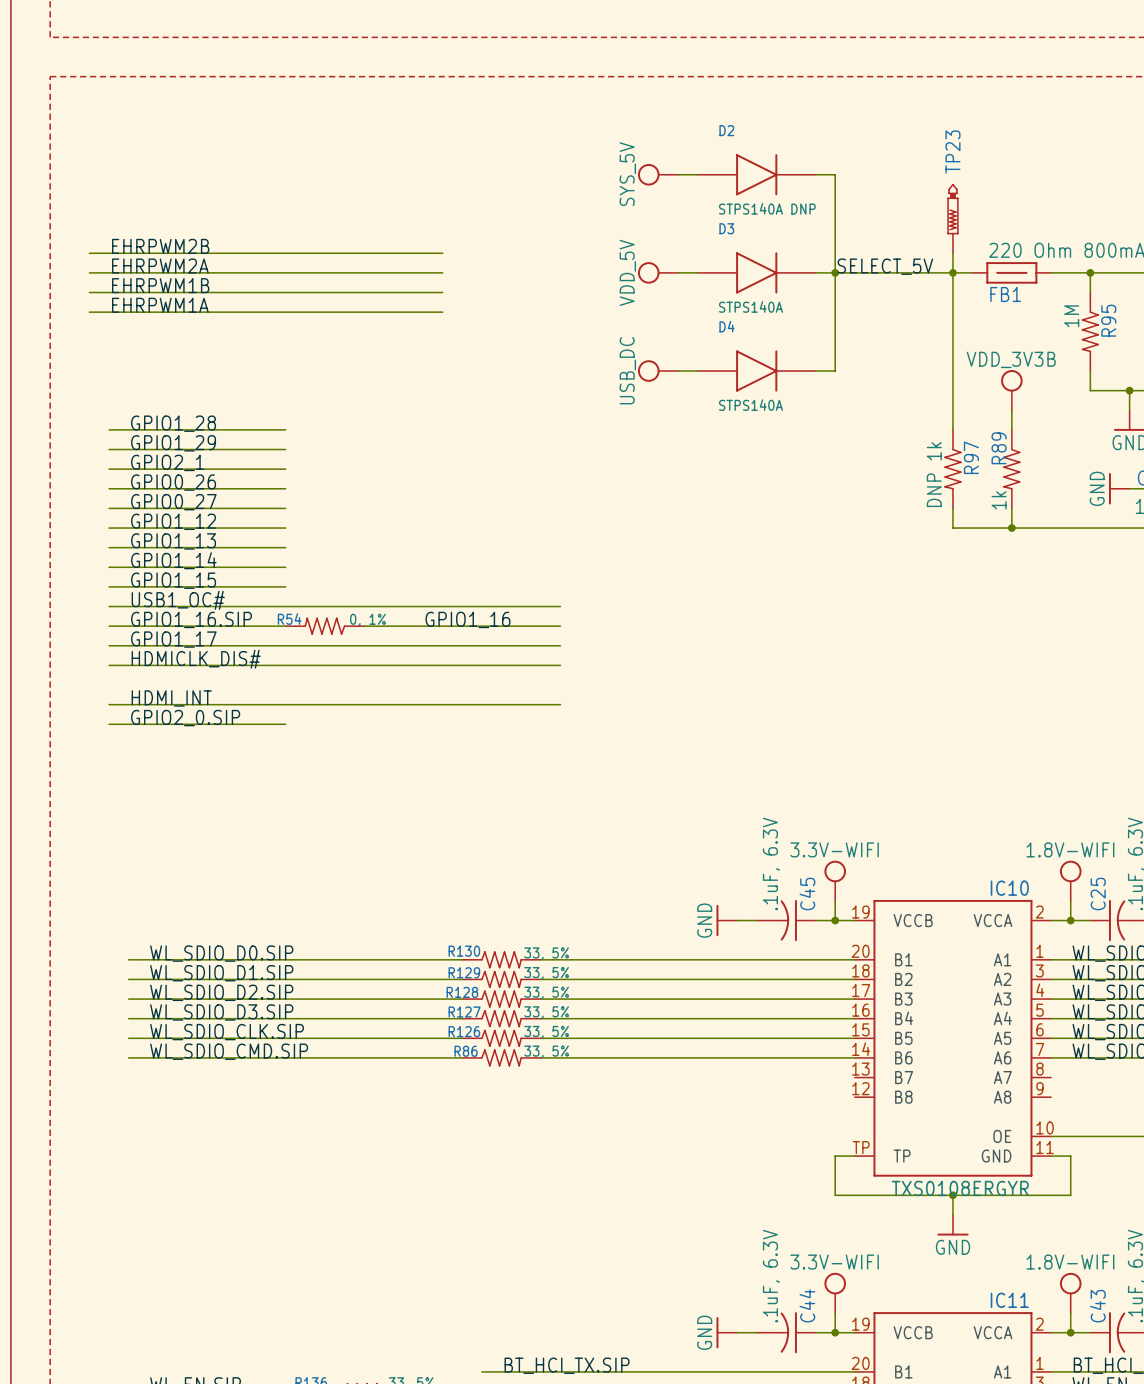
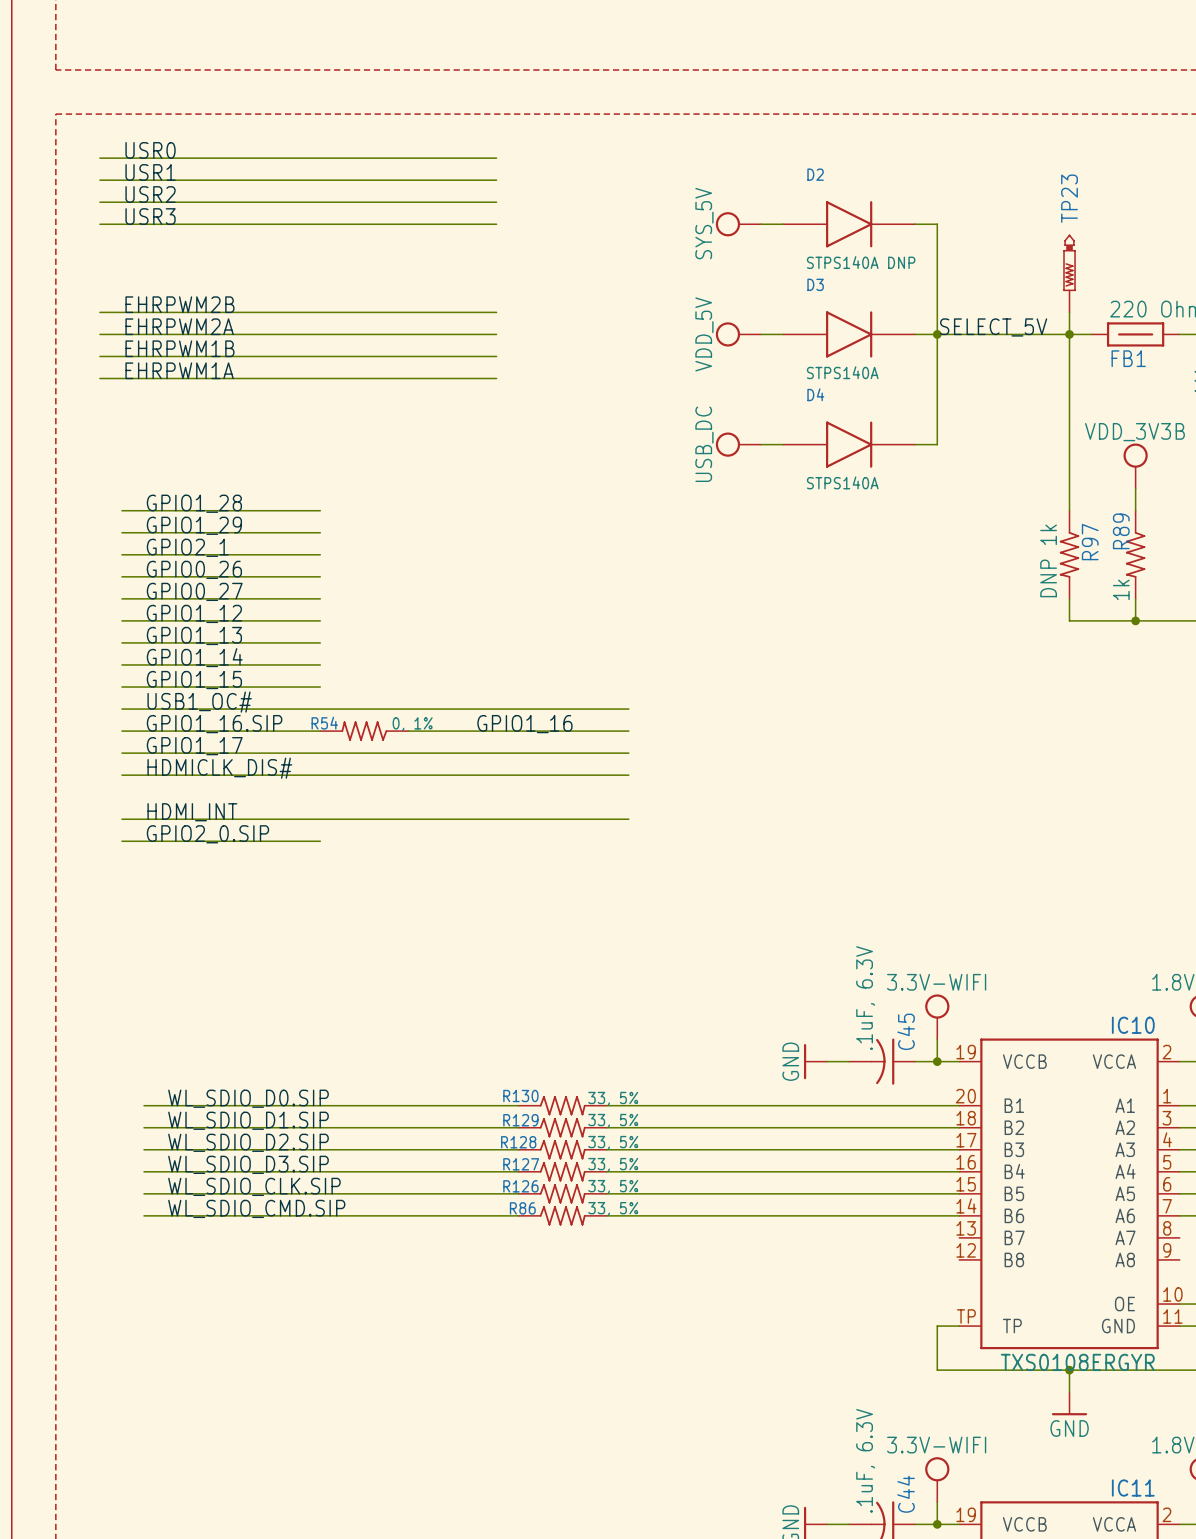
label: none -> USR0 (150, 150)
wire: none -> (99, 158) (496, 158)
label: none -> USR1 (150, 172)
wire: none -> (99, 180) (496, 180)
label: none -> USR2 (150, 194)
wire: none -> (99, 202) (496, 202)
label: none -> USR3 (150, 216)
wire: none -> (99, 224) (496, 224)

